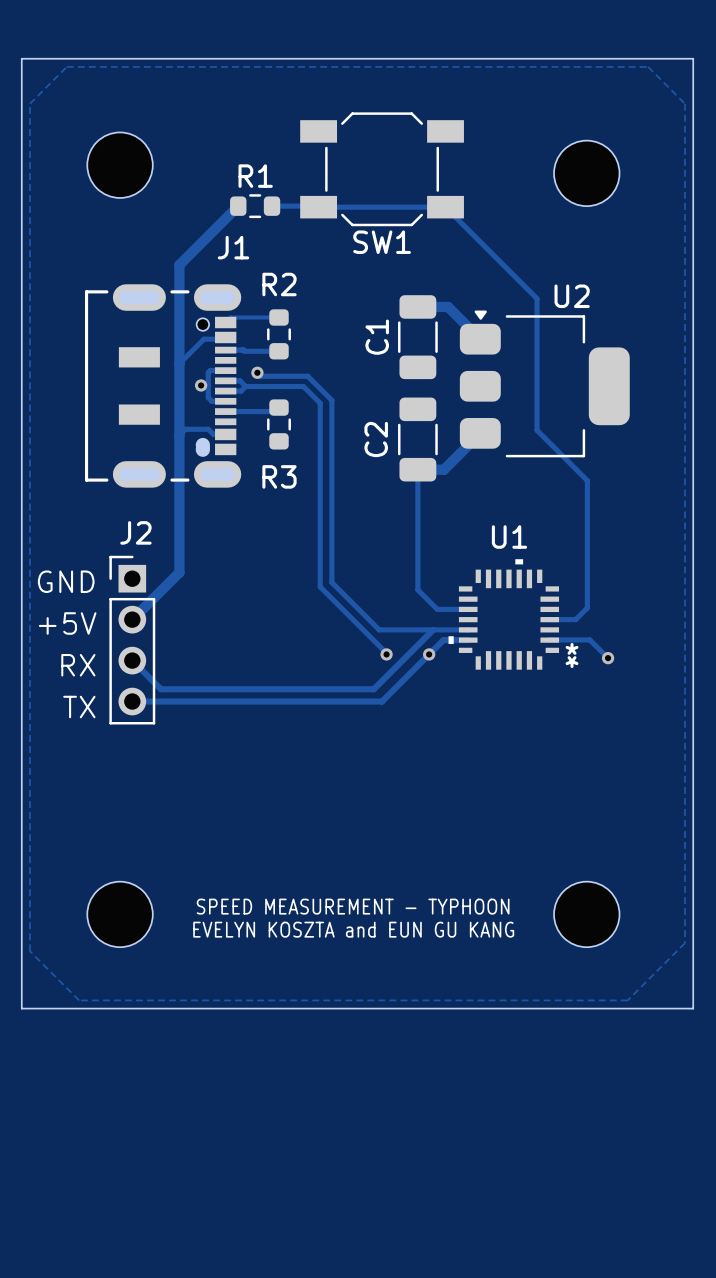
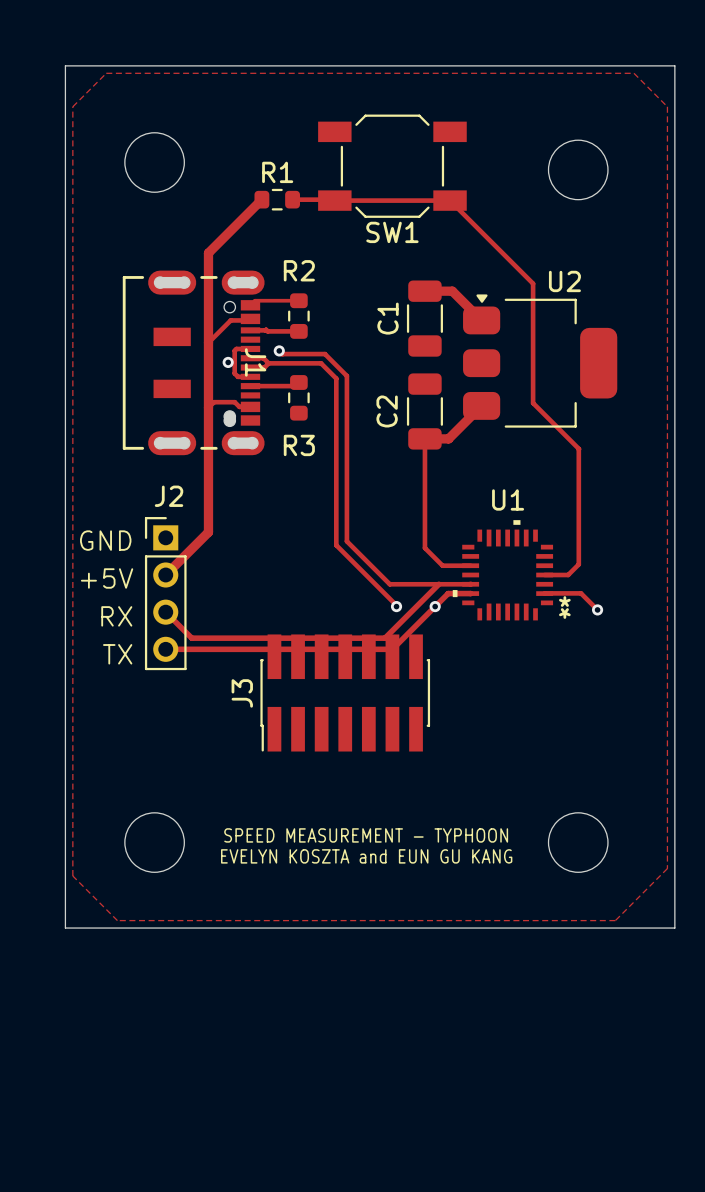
J1 name rotation: 0° (233, 247) -> 90° clockwise (255, 362)
J1 name position: J1 (233, 247) -> J1 (255, 362)
J3: none -> (345, 692)

